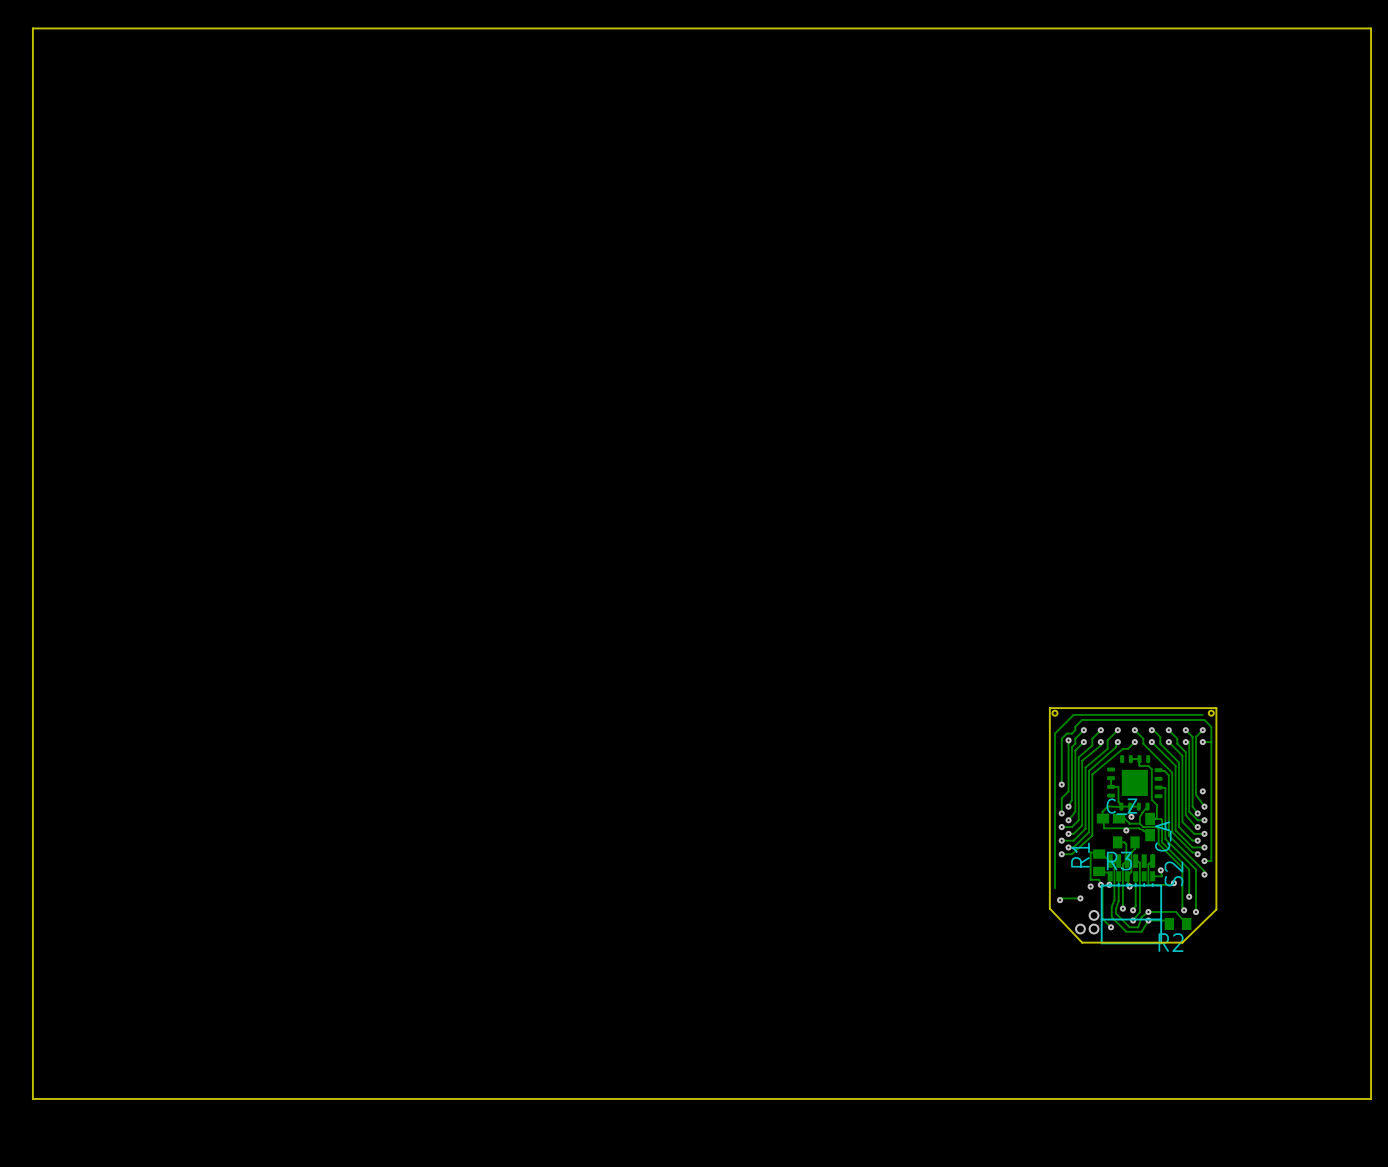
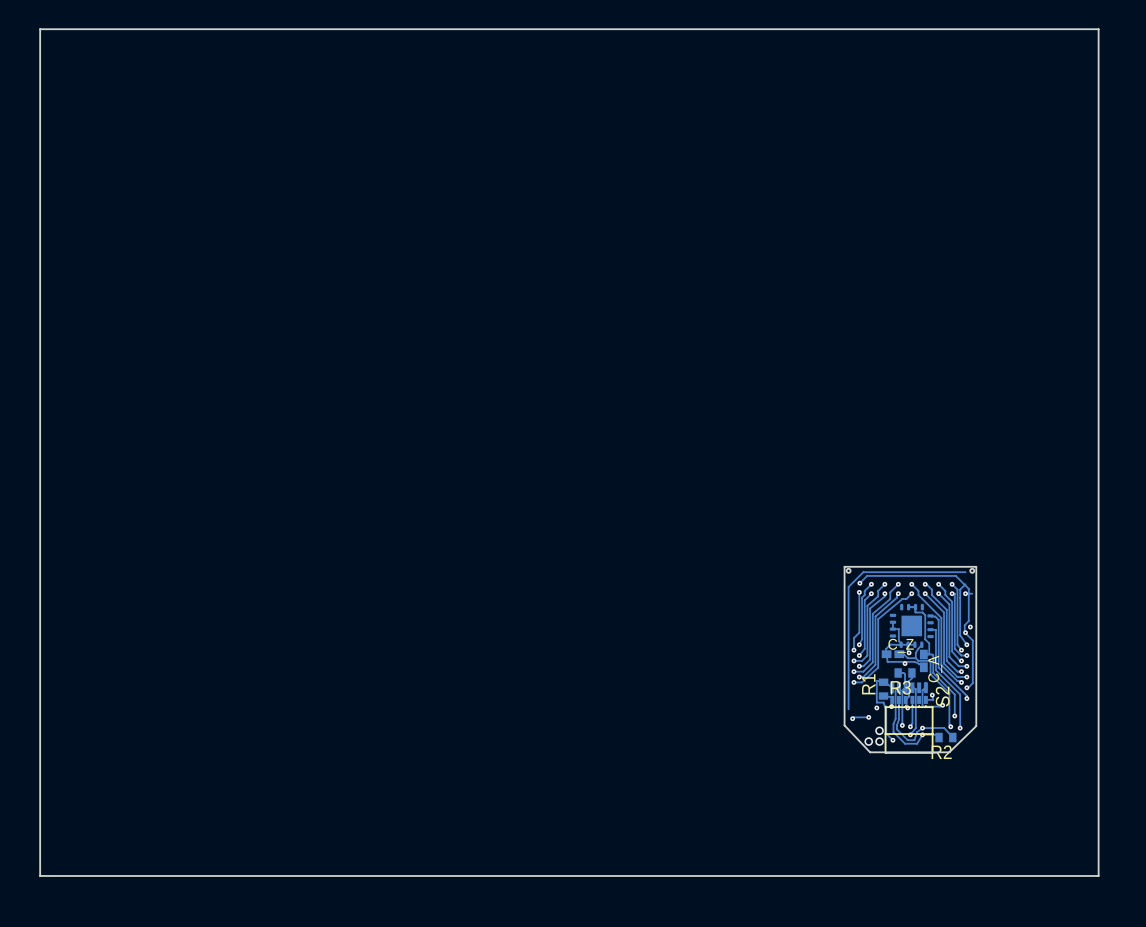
via position: (1202, 730) -> (970, 627)
track: (1061, 784) (1061, 738) (1066, 733) (1071, 733) (1082, 719) (1204, 719) (1211, 726) (1211, 861) (1204, 861) -> (859, 583) (867, 575) (955, 575) (968, 588) (968, 621) (964, 625) (964, 632) (972, 640) (972, 683) (967, 688)
via position: (1061, 784) -> (859, 583)
via: (1100, 884) -> none

